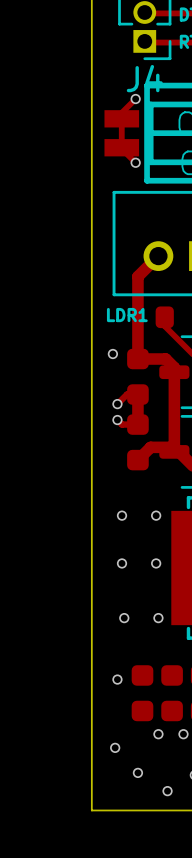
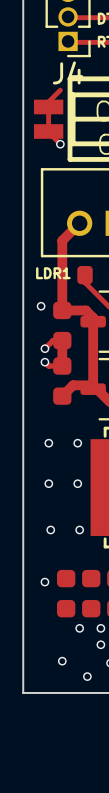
via: (135, 99) -> none
via: (115, 747) -> none
via: none -> (100, 644)

